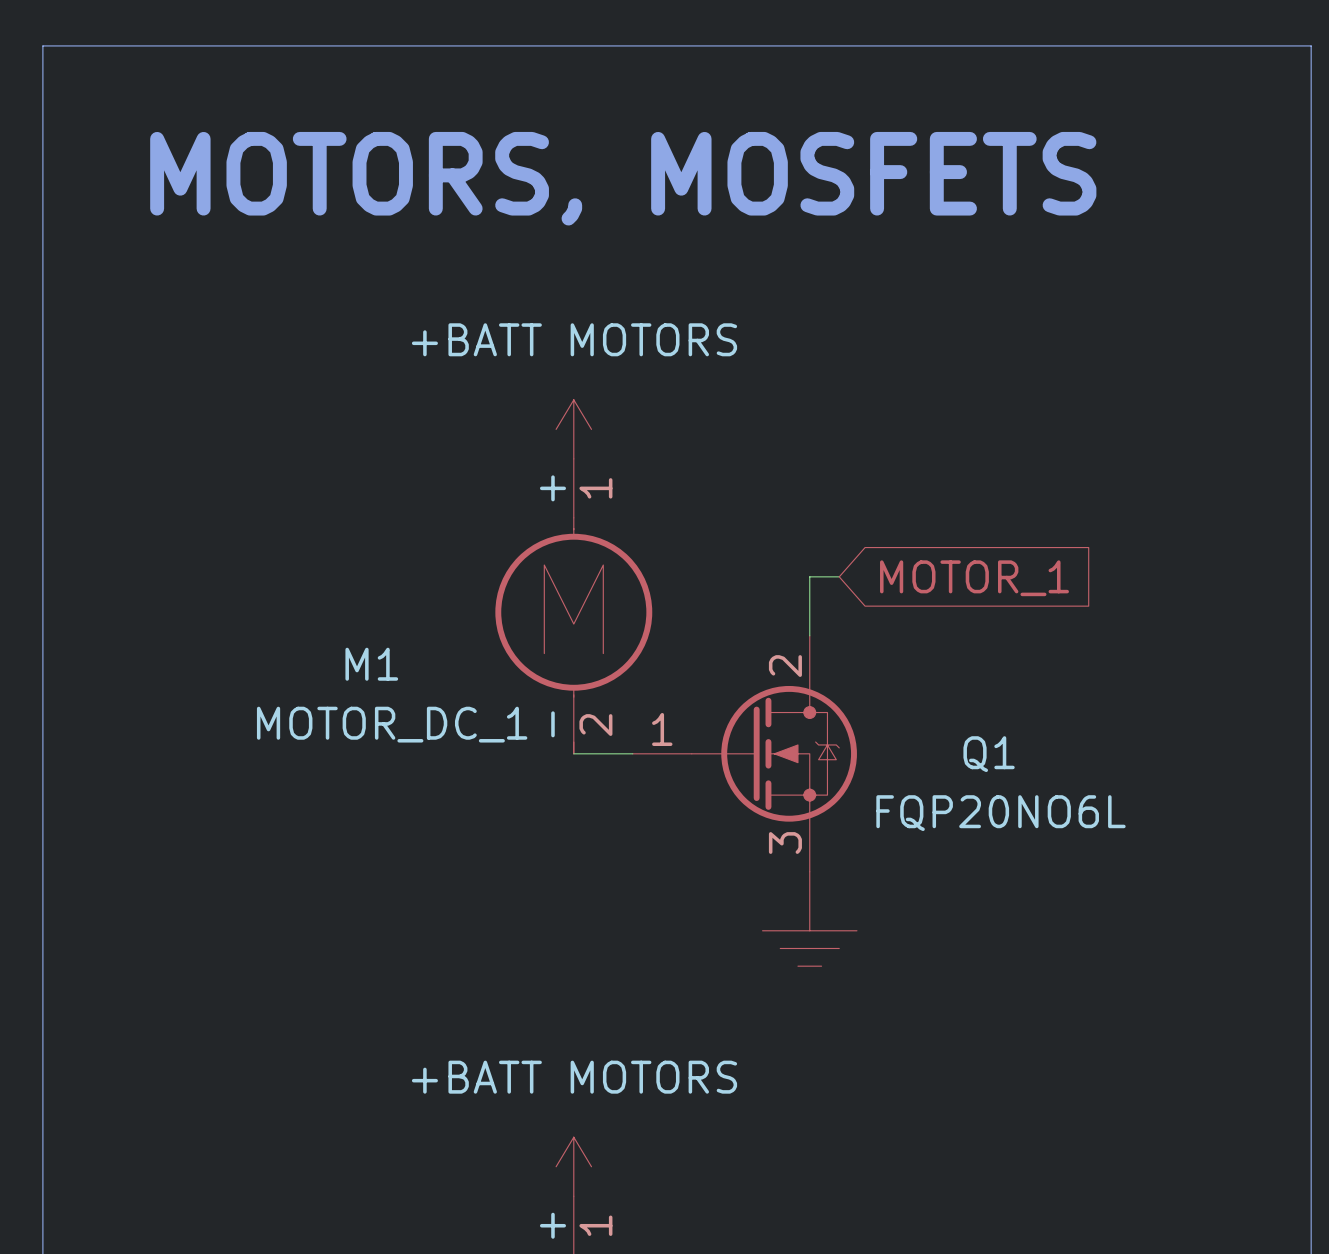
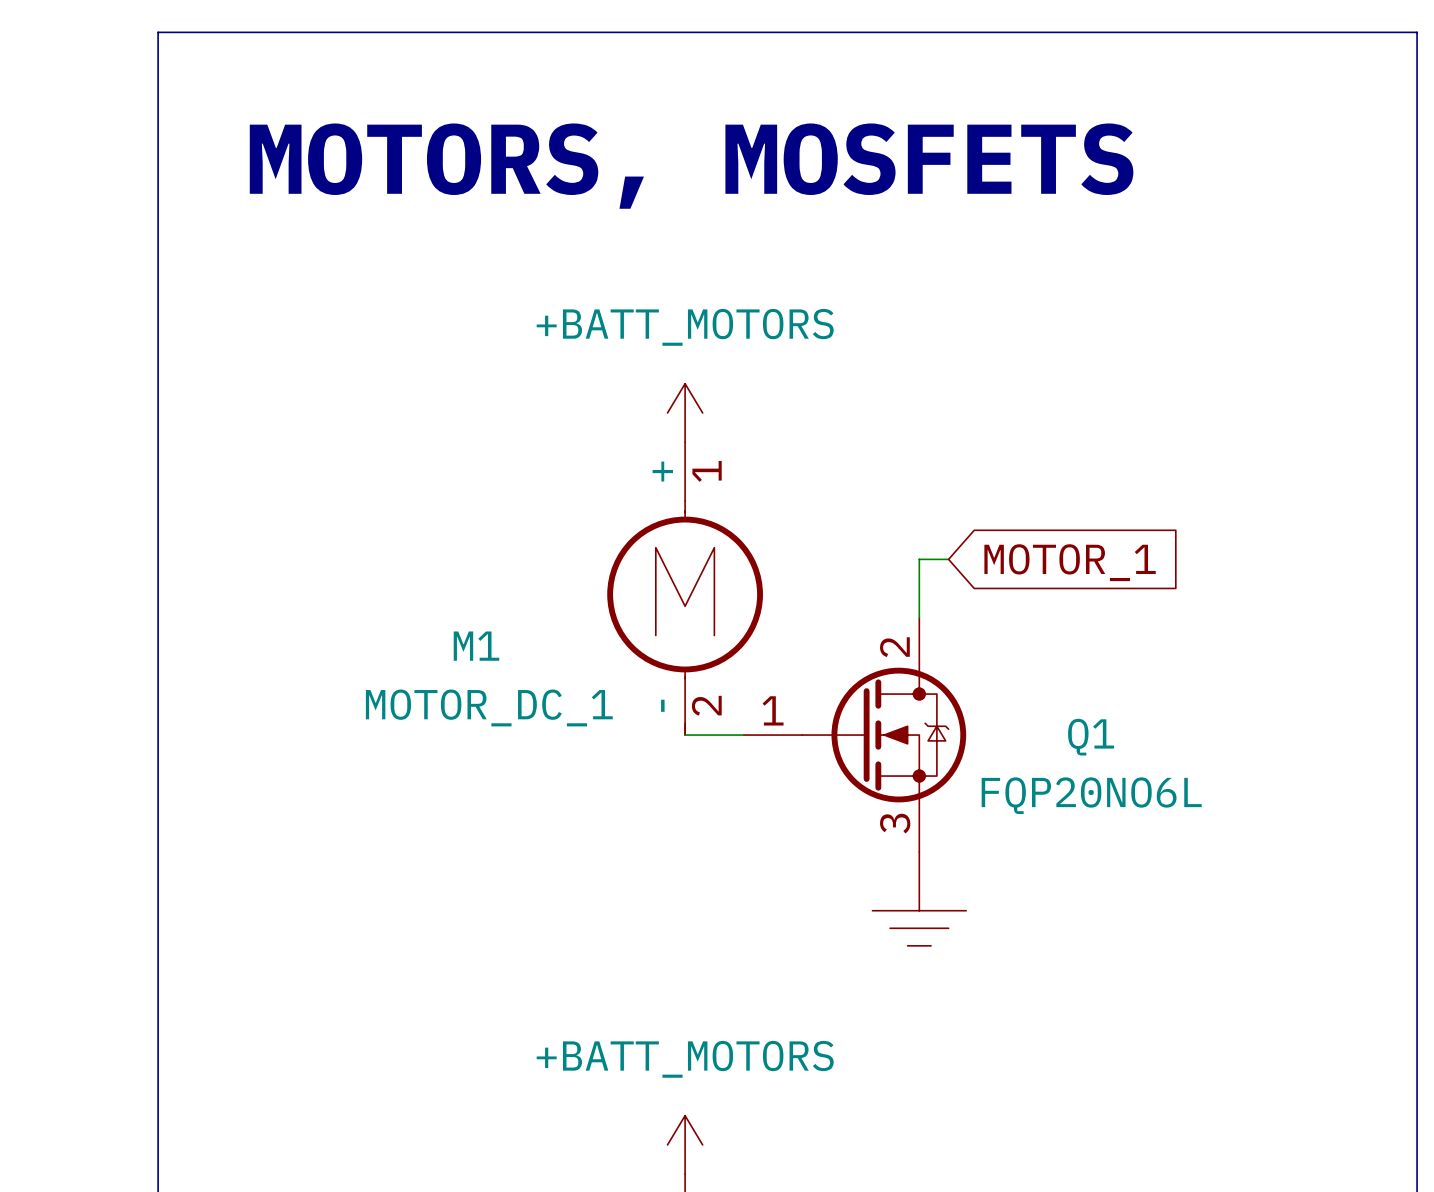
power symbol: +BATT MOTORS (573, 429) -> +BATT_MOTORS (685, 412)
power symbol: +BATT MOTORS (573, 1166) -> +BATT_MOTORS (685, 1144)

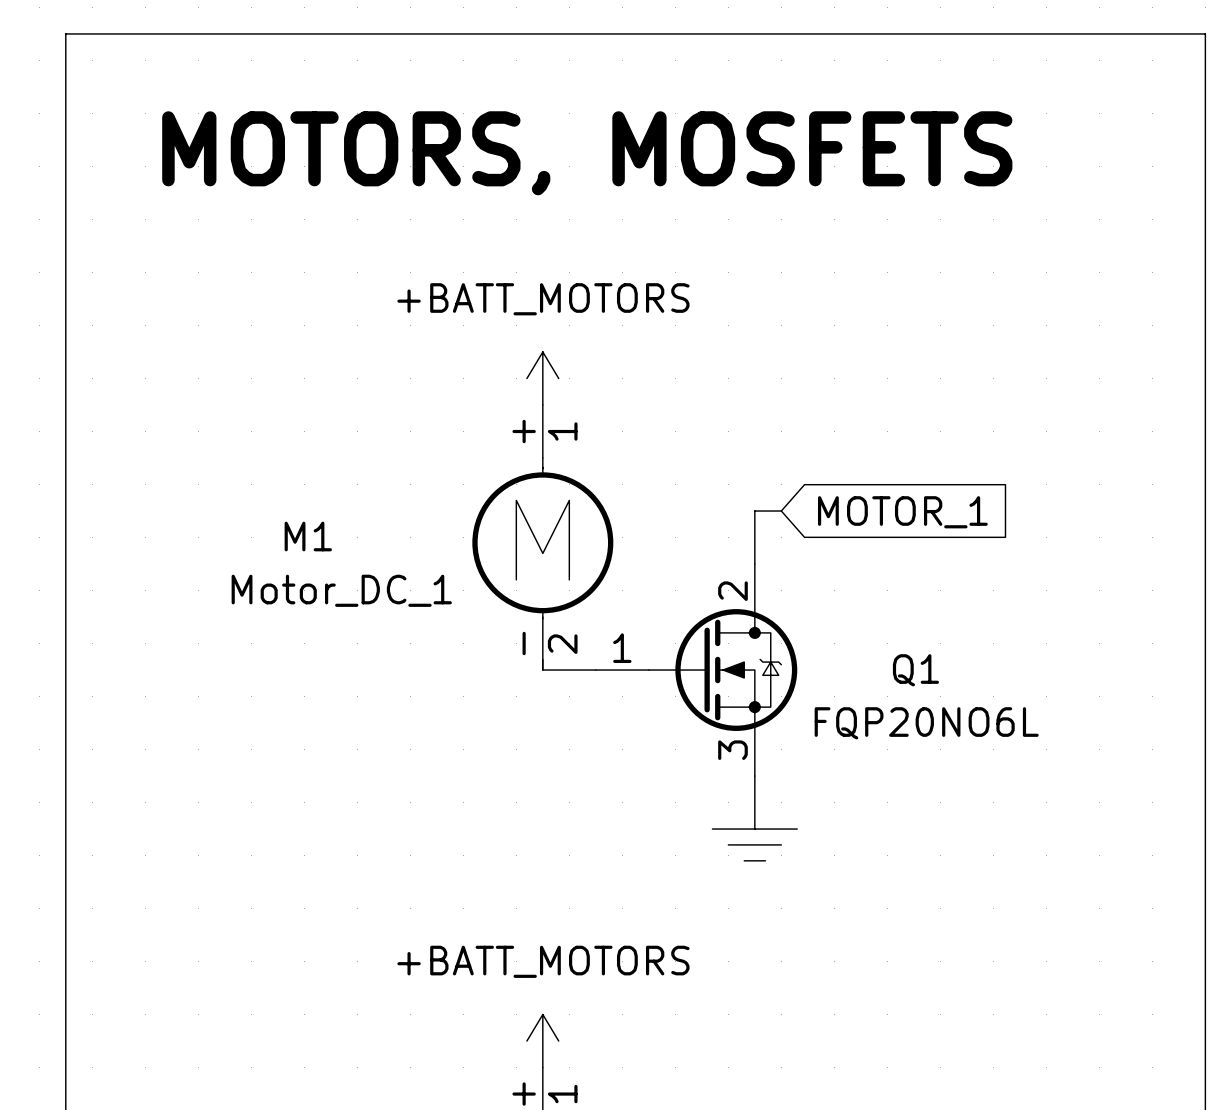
M1 name position: M1 (476, 646) -> M1 (308, 536)
M1 value: MOTOR_DC_1 (489, 707) -> Motor_DC_1 (341, 590)

